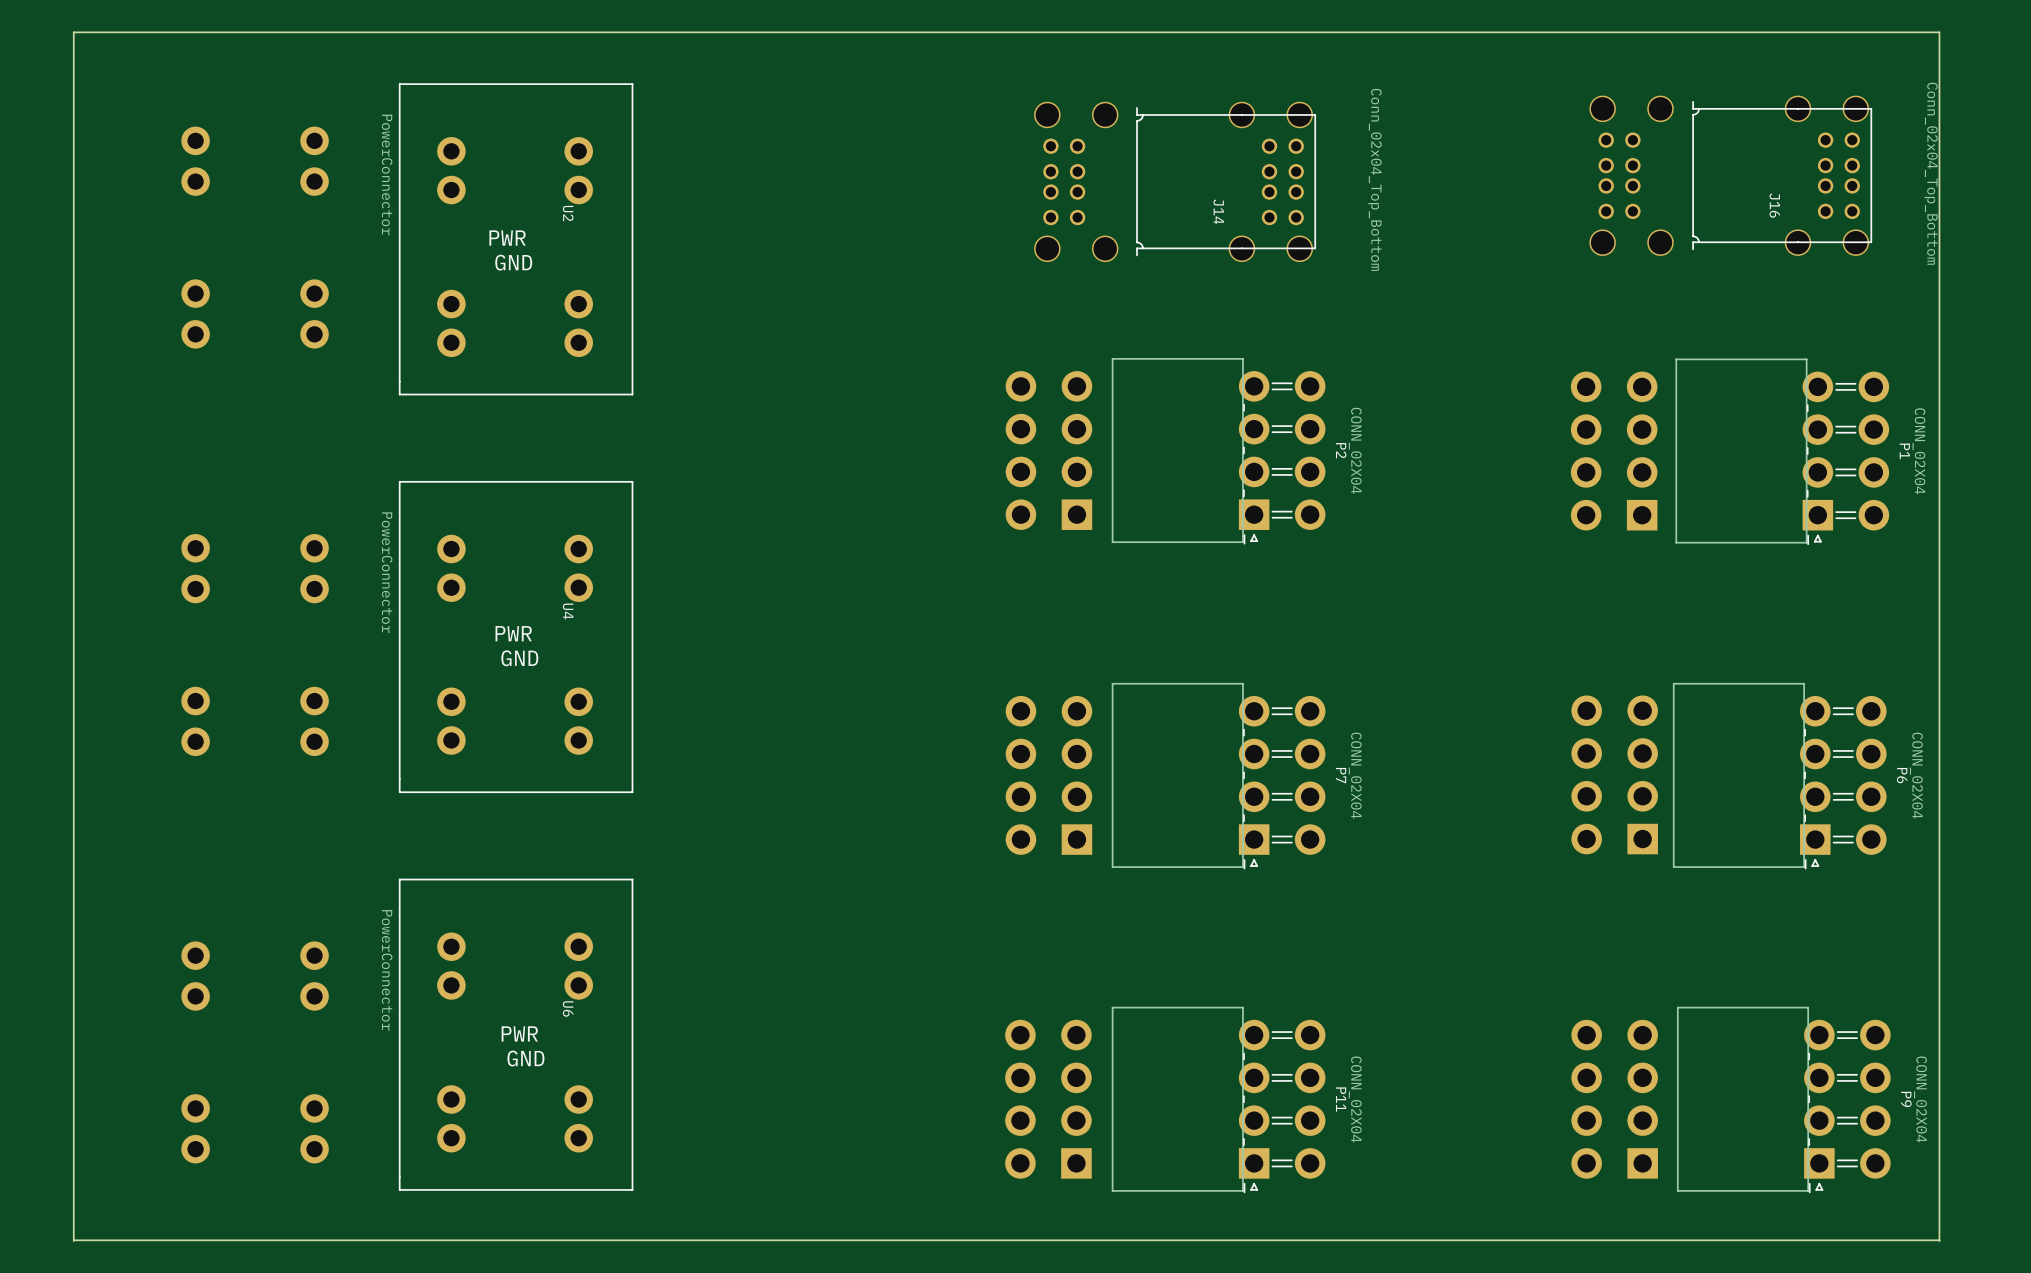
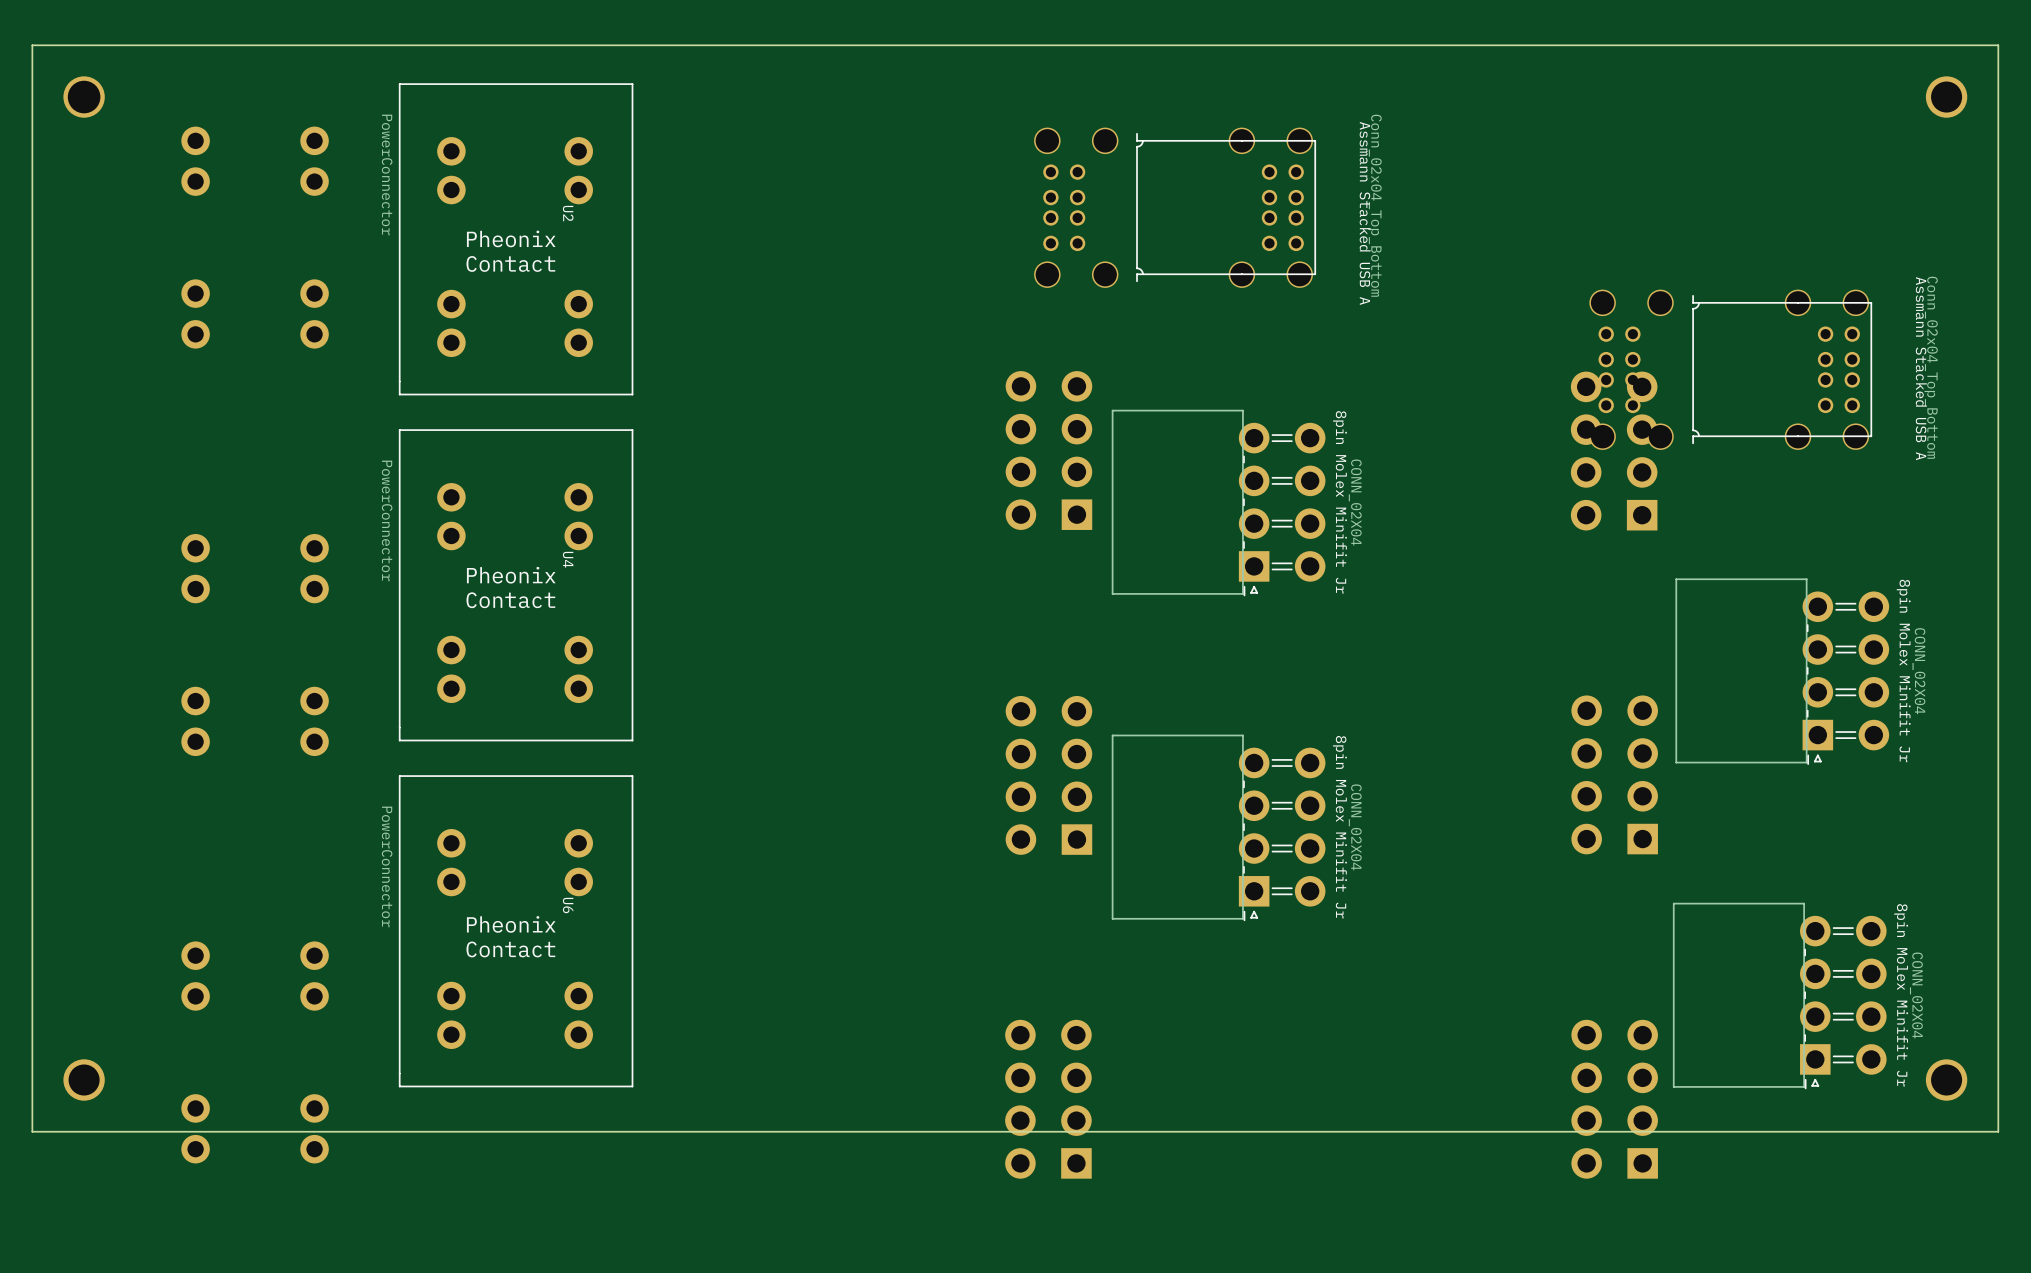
board edge: none -> (1998, 45) (1998, 1131) (32, 1131) (32, 45) (1998, 45)
part: none -> (84, 97)
part: none -> (1946, 97)
part position: (1631, 175) -> (1631, 369)
J16: Conn_02x04_Top_Bottom (1782, 175) -> none
part position: (1076, 181) -> (1076, 207)
J14: Conn_02x04_Top_Bottom (1226, 181) -> none
Assmann Stacked USB A: none -> Conn_02x04_Top_Bottom (1226, 207)
text: PWR (507, 238) -> Pheonix (511, 238)
text: GND (513, 262) -> Contact (510, 263)
Assmann Stacked USB A: none -> Conn_02x04_Top_Bottom (1782, 369)
P2: CONN_02X04 (1218, 451) -> none
P1: CONN_02X04 (1782, 452) -> none
8pin Molex Minifit Jr: none -> CONN_02X04 (1218, 503)
text: none -> Pheonix (511, 575)
text: none -> Contact (510, 600)
text: PWR (513, 633) -> none
U4 position: (516, 637) -> (516, 585)
text: GND (519, 658) -> none
8pin Molex Minifit Jr: none -> CONN_02X04 (1782, 671)
P7: CONN_02X04 (1218, 776) -> none
P6: CONN_02X04 (1780, 776) -> none
8pin Molex Minifit Jr: none -> CONN_02X04 (1218, 828)
text: none -> Pheonix (511, 924)
text: none -> Contact (510, 949)
8pin Molex Minifit Jr: none -> CONN_02X04 (1780, 996)
text: PWR (519, 1033) -> none
U6 position: (516, 1034) -> (516, 931)
text: GND (525, 1058) -> none
part: none -> (84, 1080)
part: none -> (1946, 1080)
P11: CONN_02X04 (1218, 1100) -> none
P9: CONN_02X04 (1784, 1100) -> none
board edge: (1939, 1240) (73, 1240) -> none
board edge: (1939, 1241) (1939, 32) (73, 32) (73, 1241) -> none

